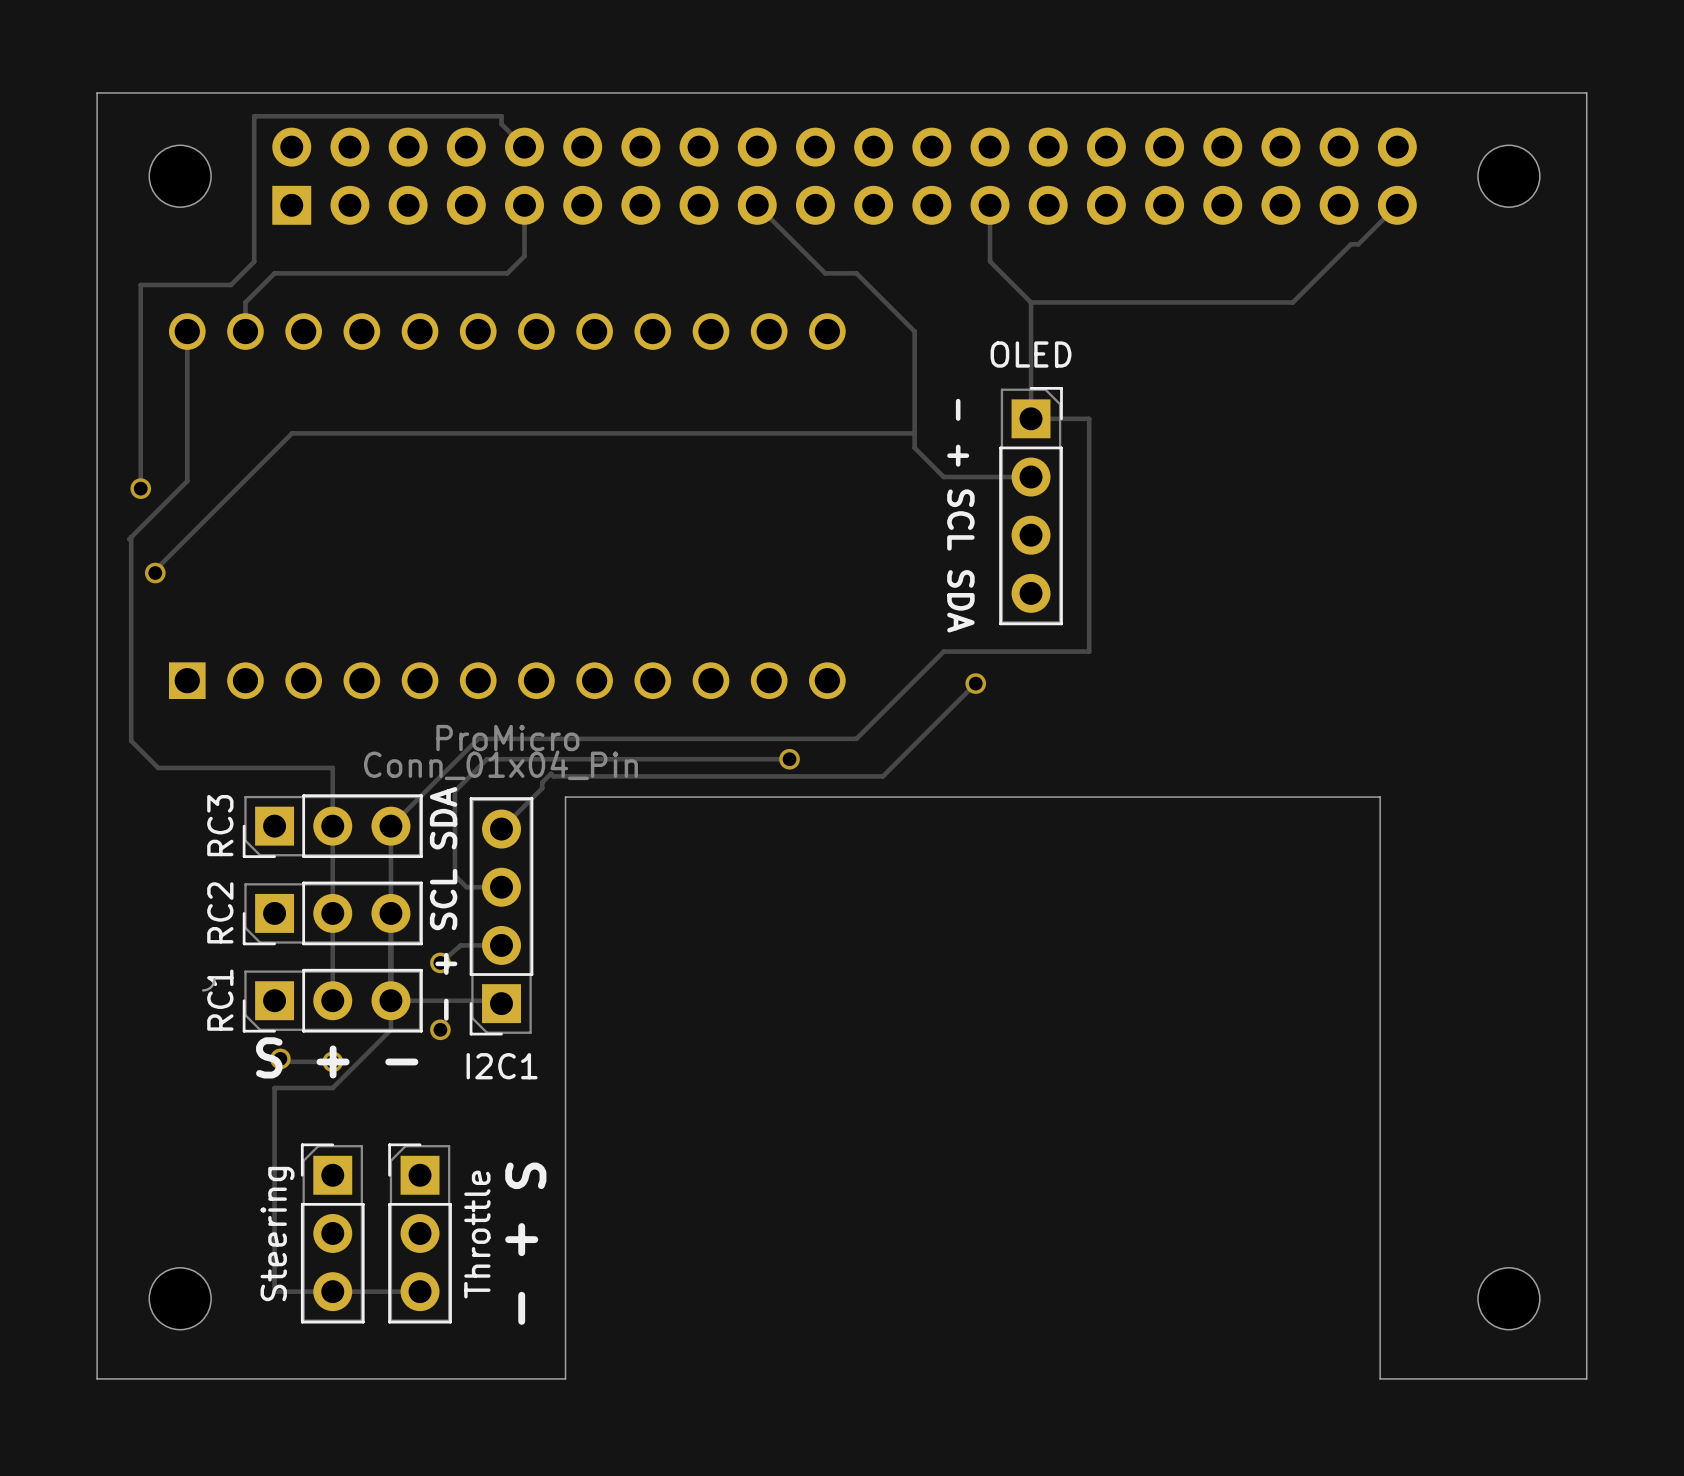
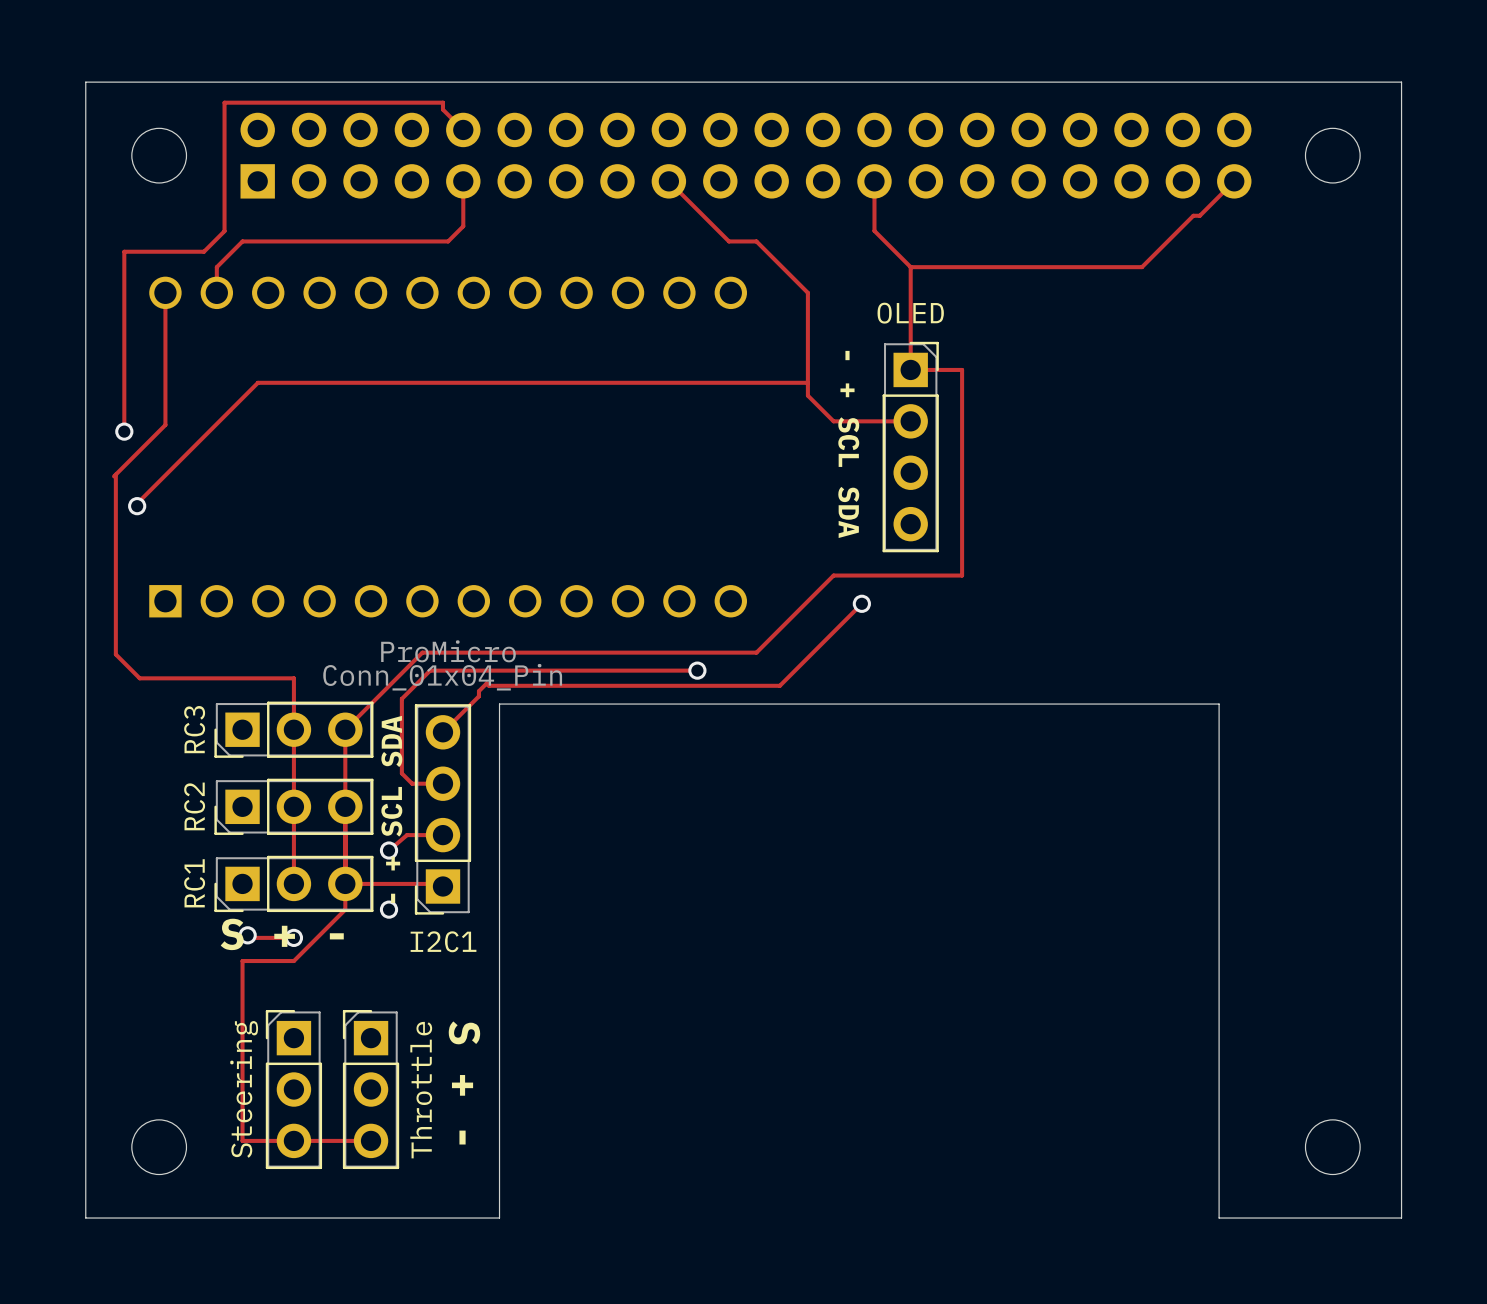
board edge: (214, 978) (211, 987) (203, 990) -> none

